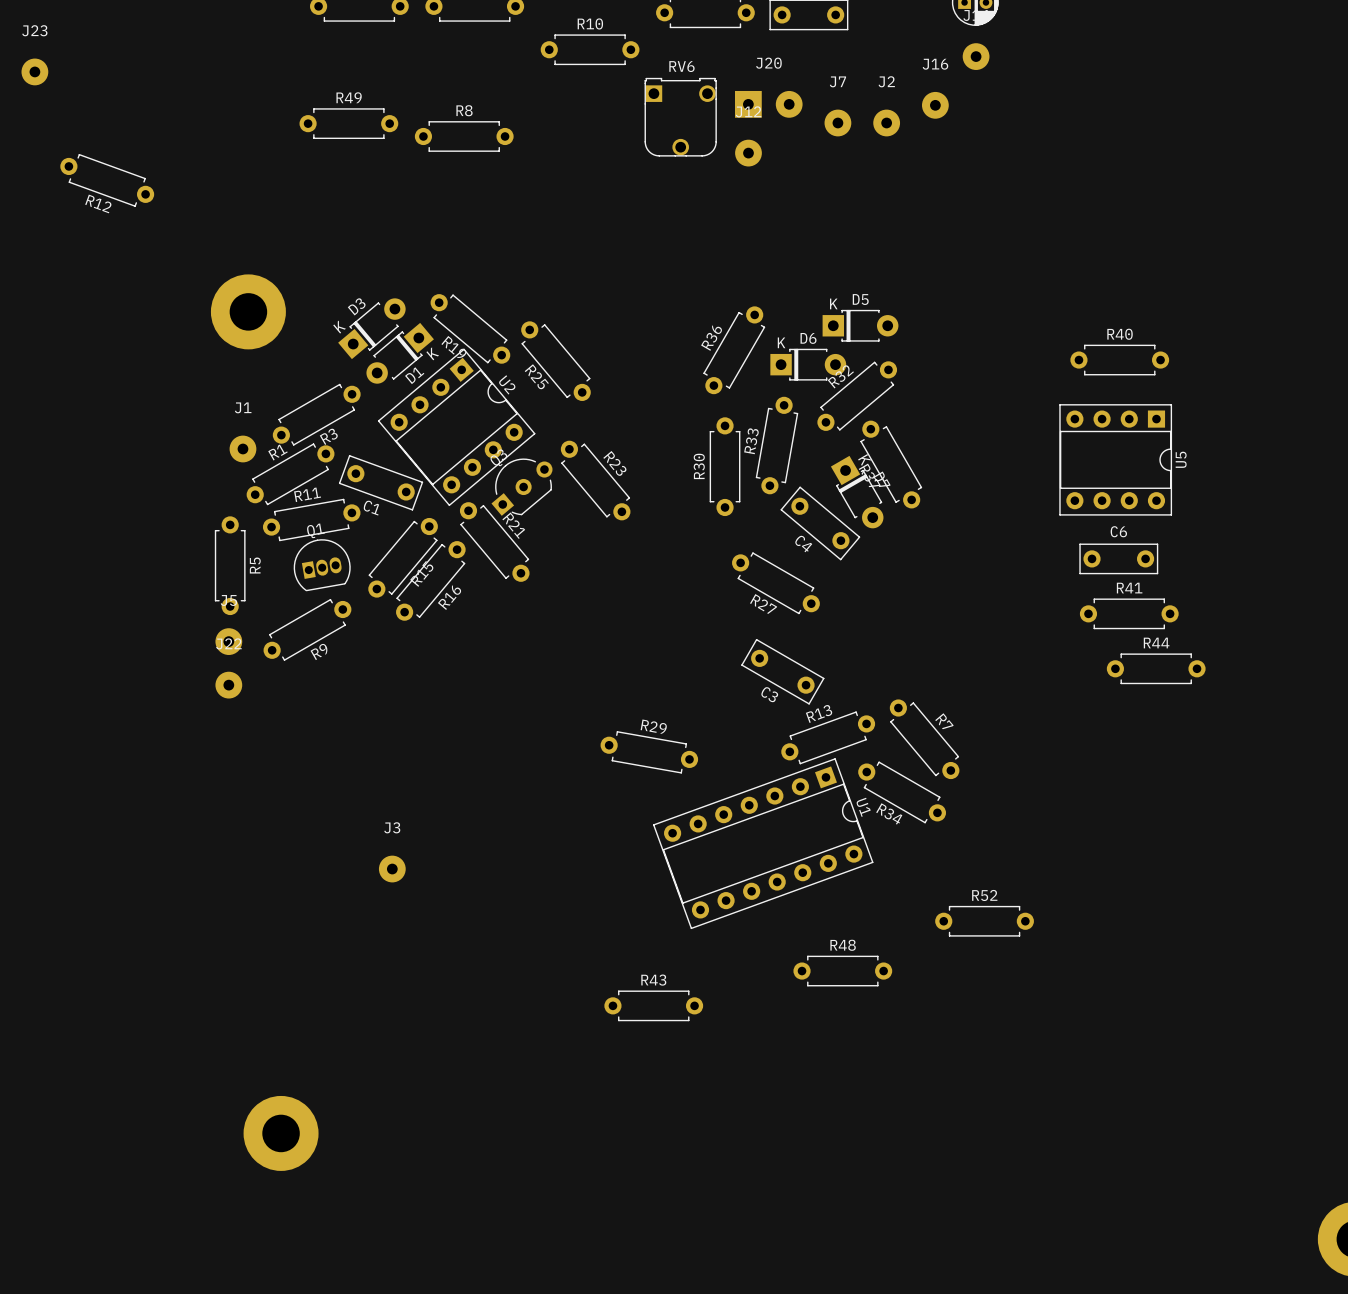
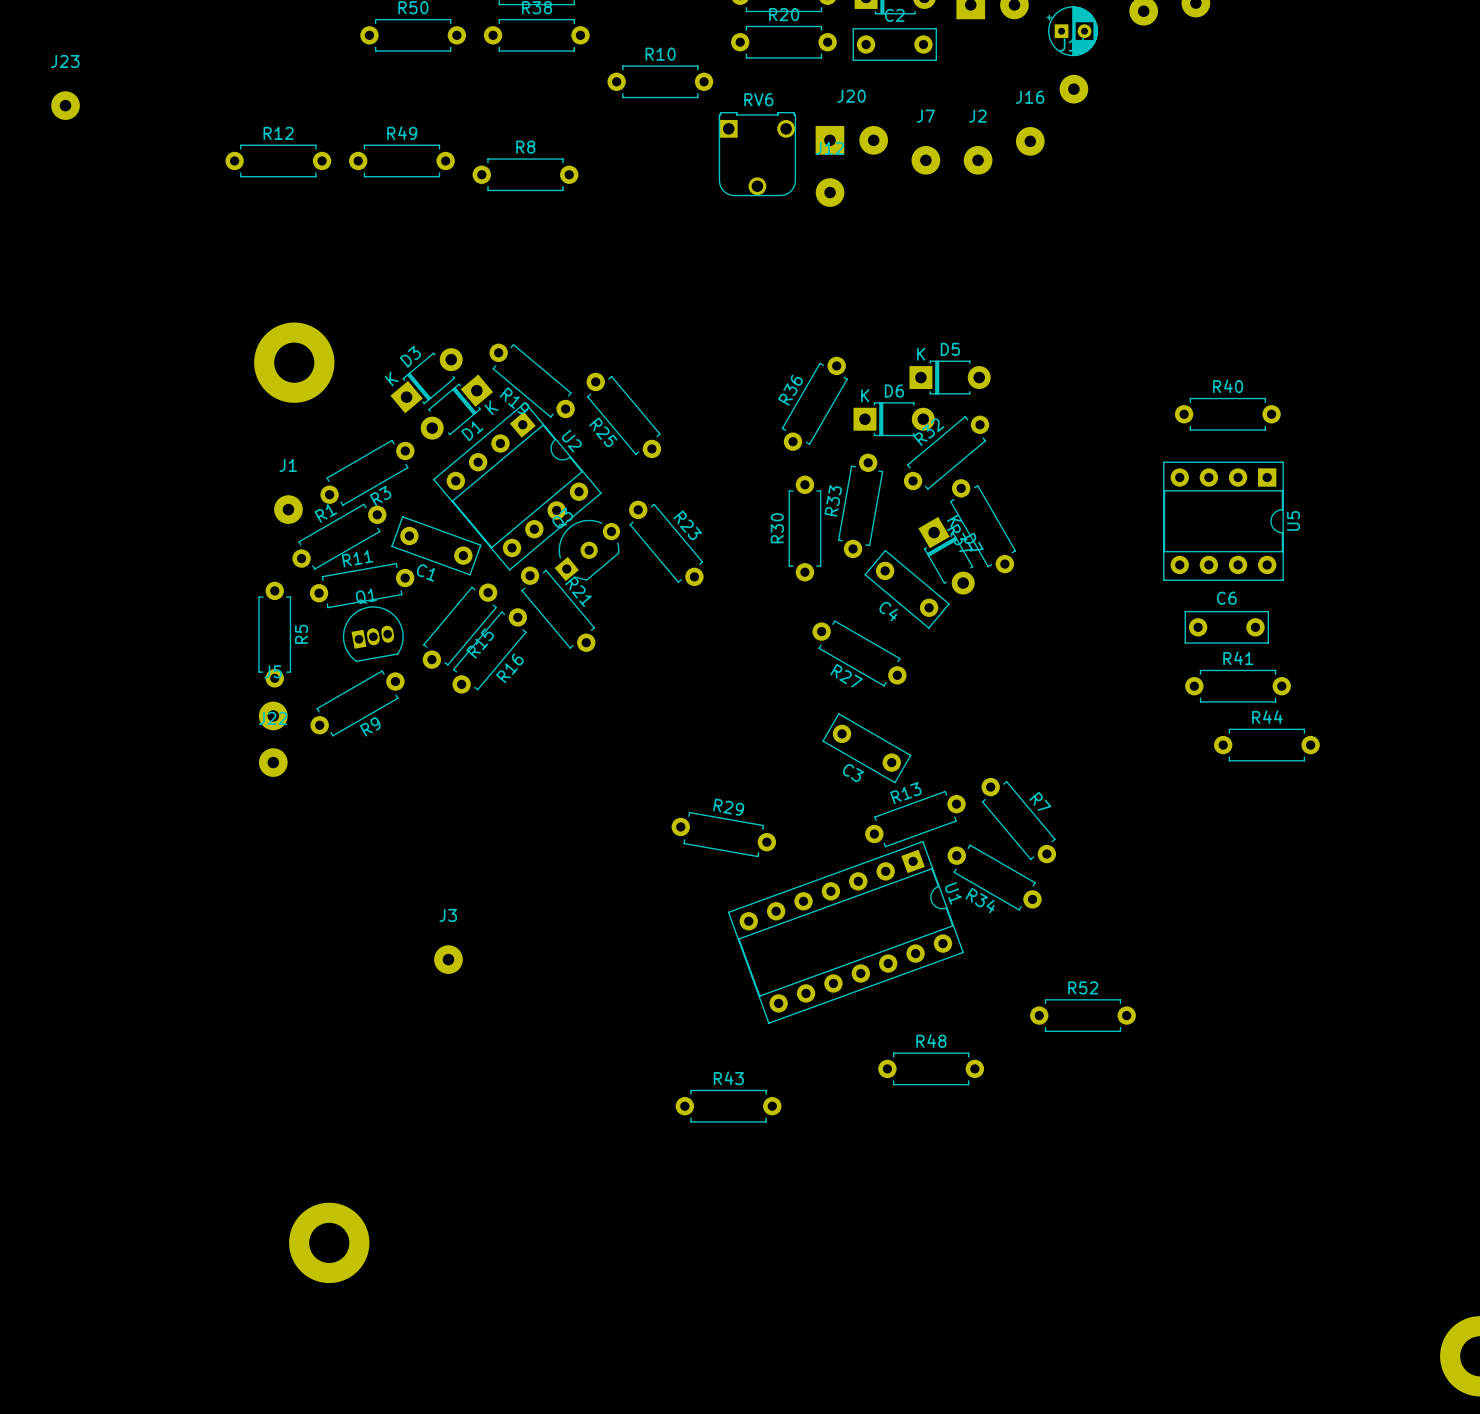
R12 rotation: 0° (107, 180) -> 20° counterclockwise (278, 160)
R12 position: (107, 180) -> (278, 160)
R12 name position: R12 (98, 203) -> R12 (278, 133)

